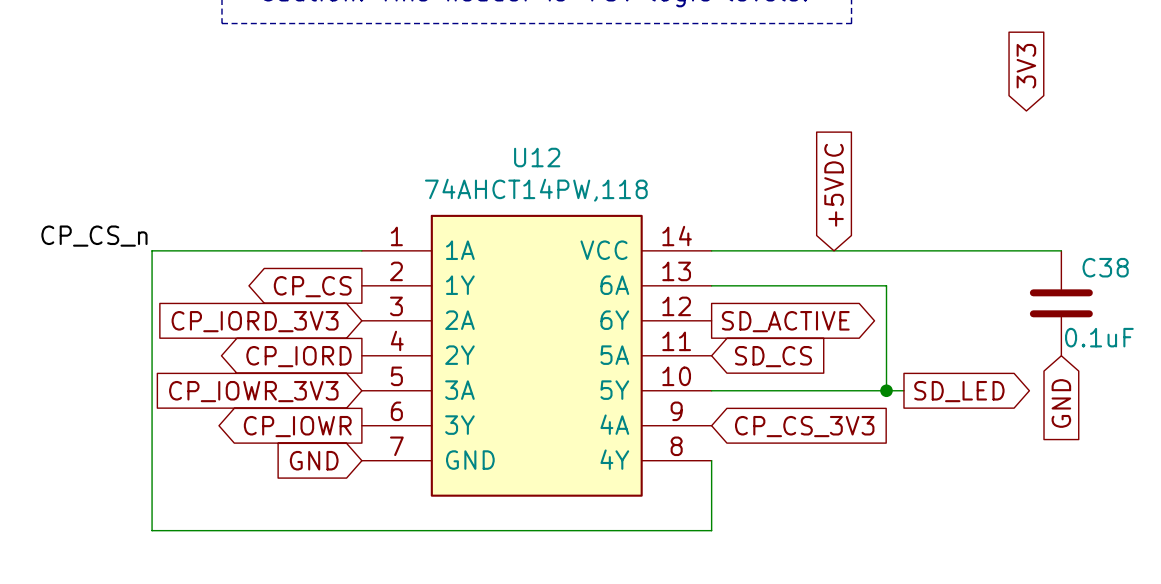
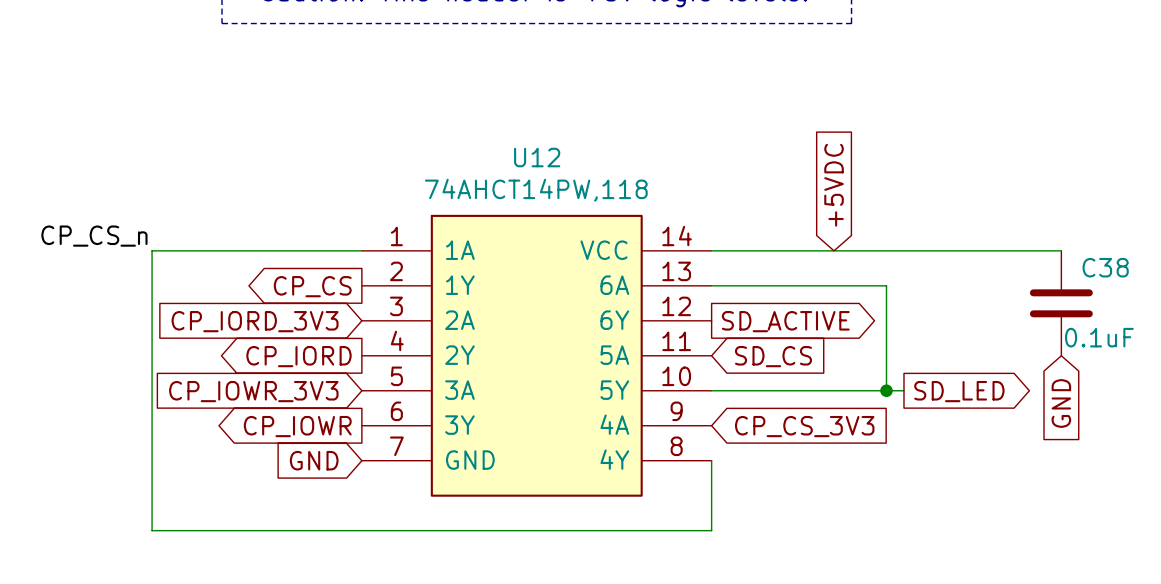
global label: 3V3 (1026, 66) -> none

